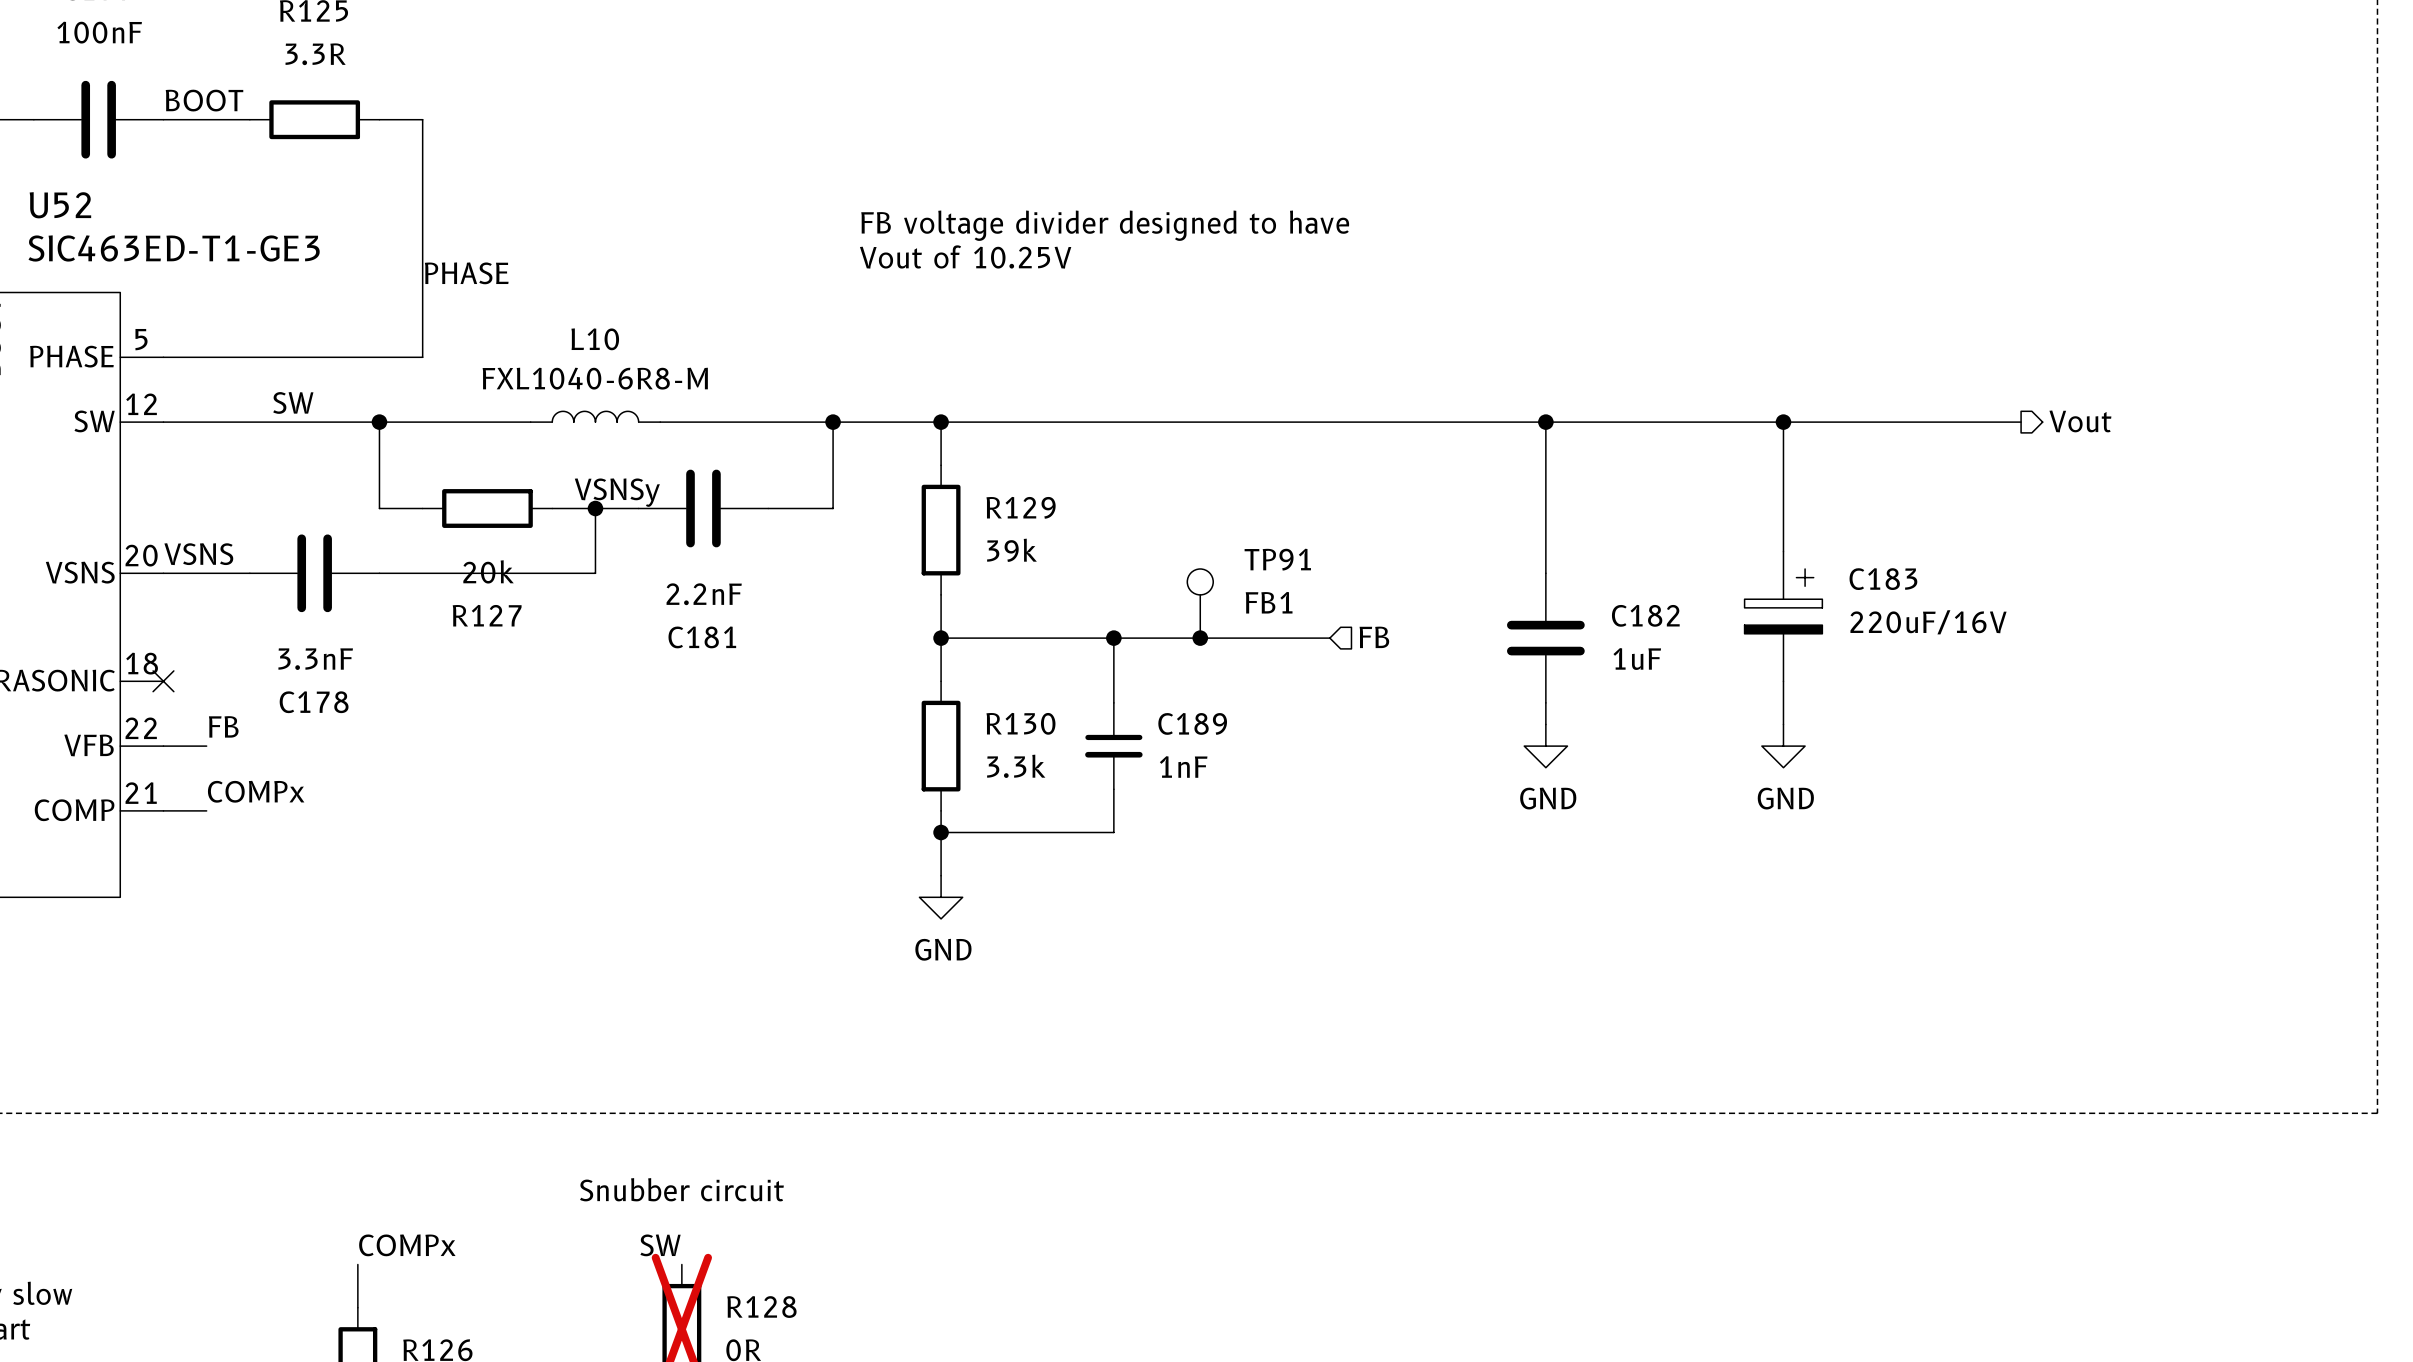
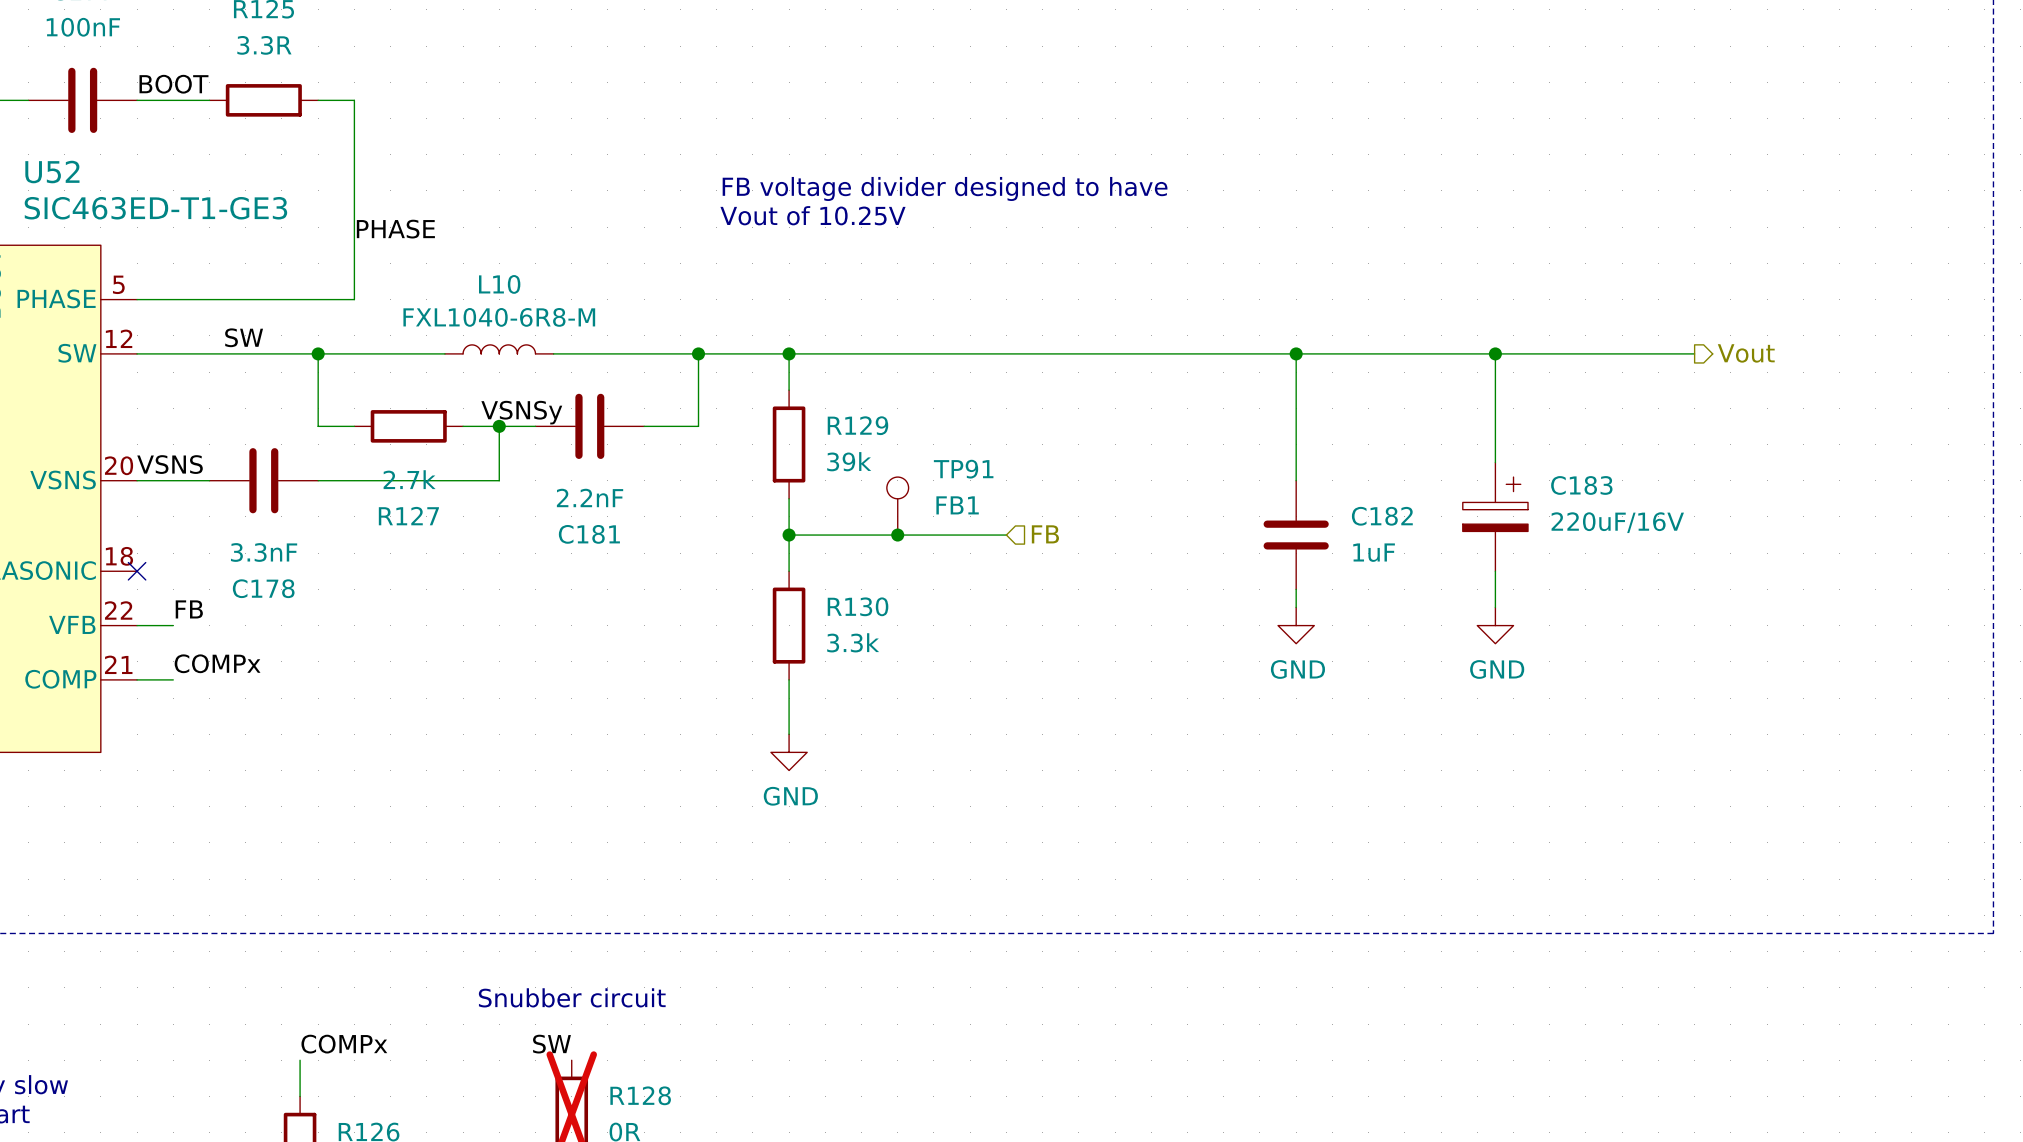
R127 value: 20k (488, 571) -> 2.7k (409, 479)
TP91 position: (1200, 603) -> (897, 506)
hierarchical label position: FB (1374, 637) -> FB (1045, 534)
wire: (1113, 638) (1113, 702) -> none
junction position: (1113, 638) -> (897, 535)
wire: (1200, 638) (1329, 638) -> none
junction: (1200, 638) -> none
C189: 1nF (1113, 746) -> none
wire: (1113, 789) (1113, 832) (941, 832) -> none
junction: (941, 832) -> none

